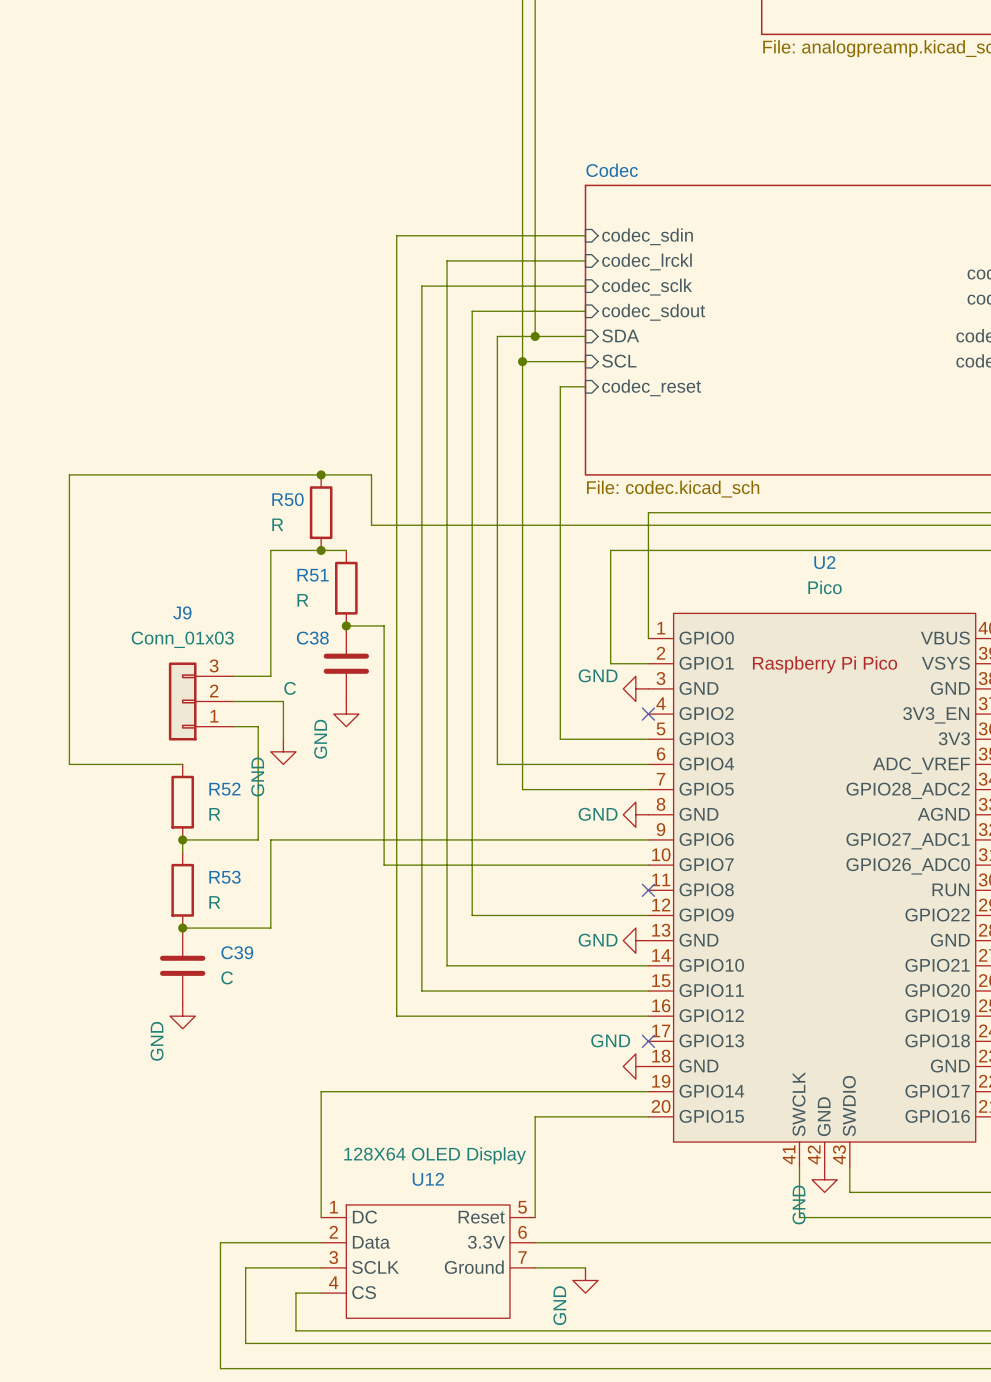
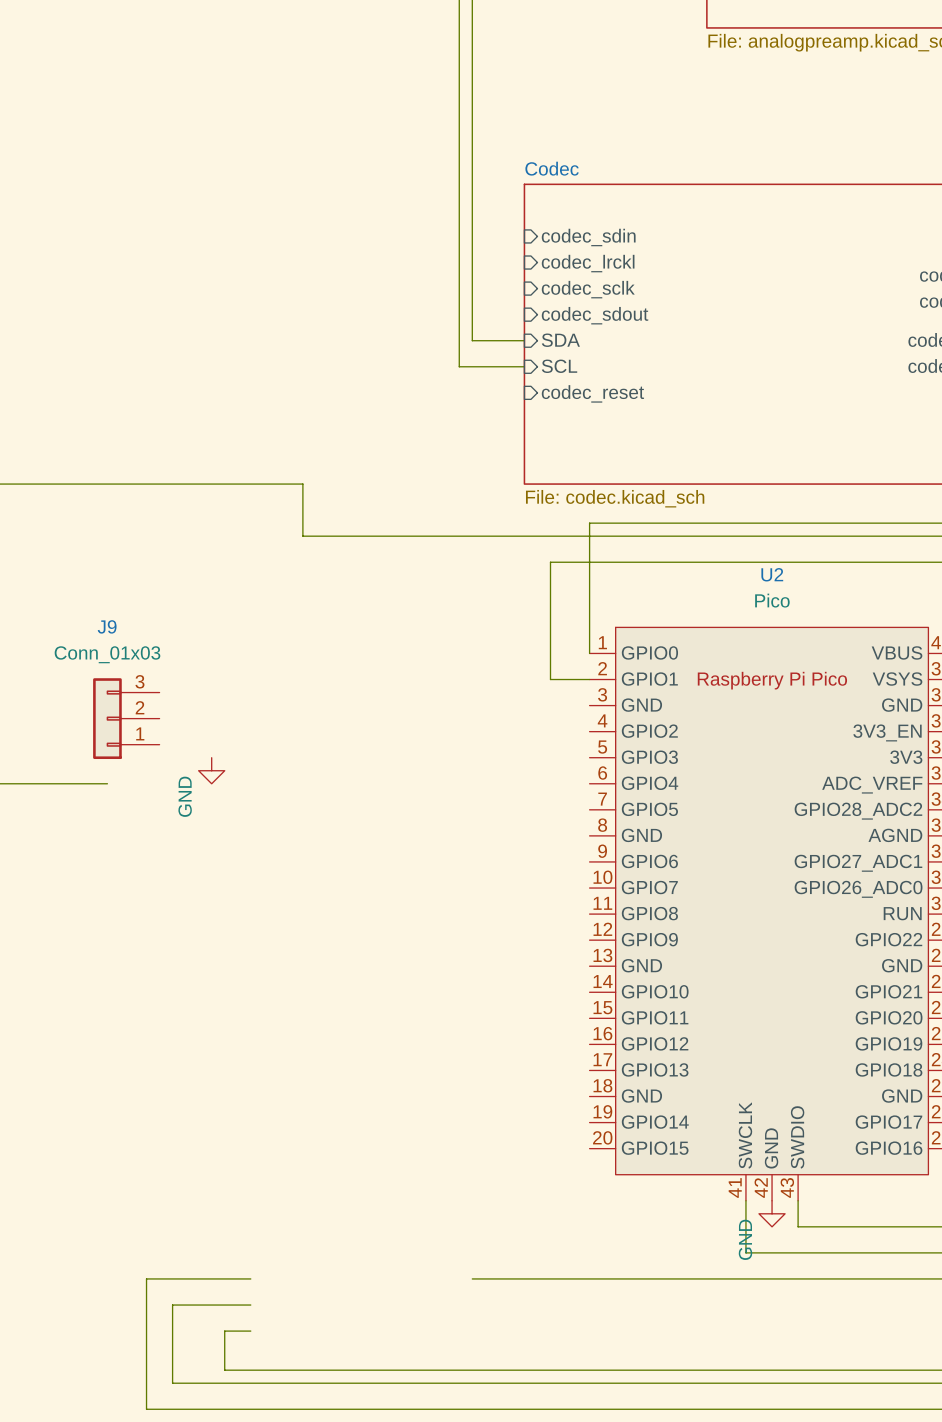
wire: (585, 235) (396, 235) (396, 1016) (648, 1016) -> none
wire: (585, 260) (447, 260) (447, 965) (648, 965) -> none
wire: (585, 286) (421, 286) (421, 990) (648, 990) -> none
wire: (585, 311) (472, 311) (472, 915) (648, 915) -> none
wire: (535, 336) (497, 336) (497, 764) (648, 764) -> none
junction: (535, 336) -> none
wire: (522, 361) (522, 789) (648, 789) -> none
junction: (522, 361) -> none
wire: (585, 386) (560, 386) (560, 739) (648, 739) -> none
junction: (321, 474) -> none
R50: R (321, 512) -> none
junction: (321, 550) -> none
wire: (346, 550) (270, 550) (270, 676) (233, 676) -> none
R51: R (346, 588) -> none
wire: (346, 625) (384, 625) (384, 865) (648, 865) -> none
junction: (346, 625) -> none
C38: C (346, 663) -> none
power symbol: GND (635, 688) -> none
wire: (233, 701) (283, 701) (283, 739) -> none
power symbol: GND (346, 714) -> none
no-connect mark: (648, 714) -> none
wire: (233, 726) (258, 726) (258, 839) (182, 839) (182, 852) -> none
R52: R (182, 802) -> none
power symbol: GND (635, 814) -> none
junction: (182, 839) -> none
wire: (648, 839) (270, 839) (270, 928) (182, 928) -> none
R53: R (182, 890) -> none
no-connect mark: (648, 890) -> none
junction: (182, 928) -> none
power symbol: GND (635, 940) -> none
C39: C (182, 965) -> none
power symbol: GND (182, 1016) -> none
no-connect mark: (648, 1041) -> none
power symbol: GND (635, 1066) -> none
wire: (648, 1091) (321, 1091) (321, 1217) -> none
wire: (648, 1116) (535, 1116) (535, 1217) -> none
U12: 128X64 OLED Display (428, 1261) -> none
wire: (535, 1267) (585, 1267) -> none
power symbol: GND (585, 1280) -> none

